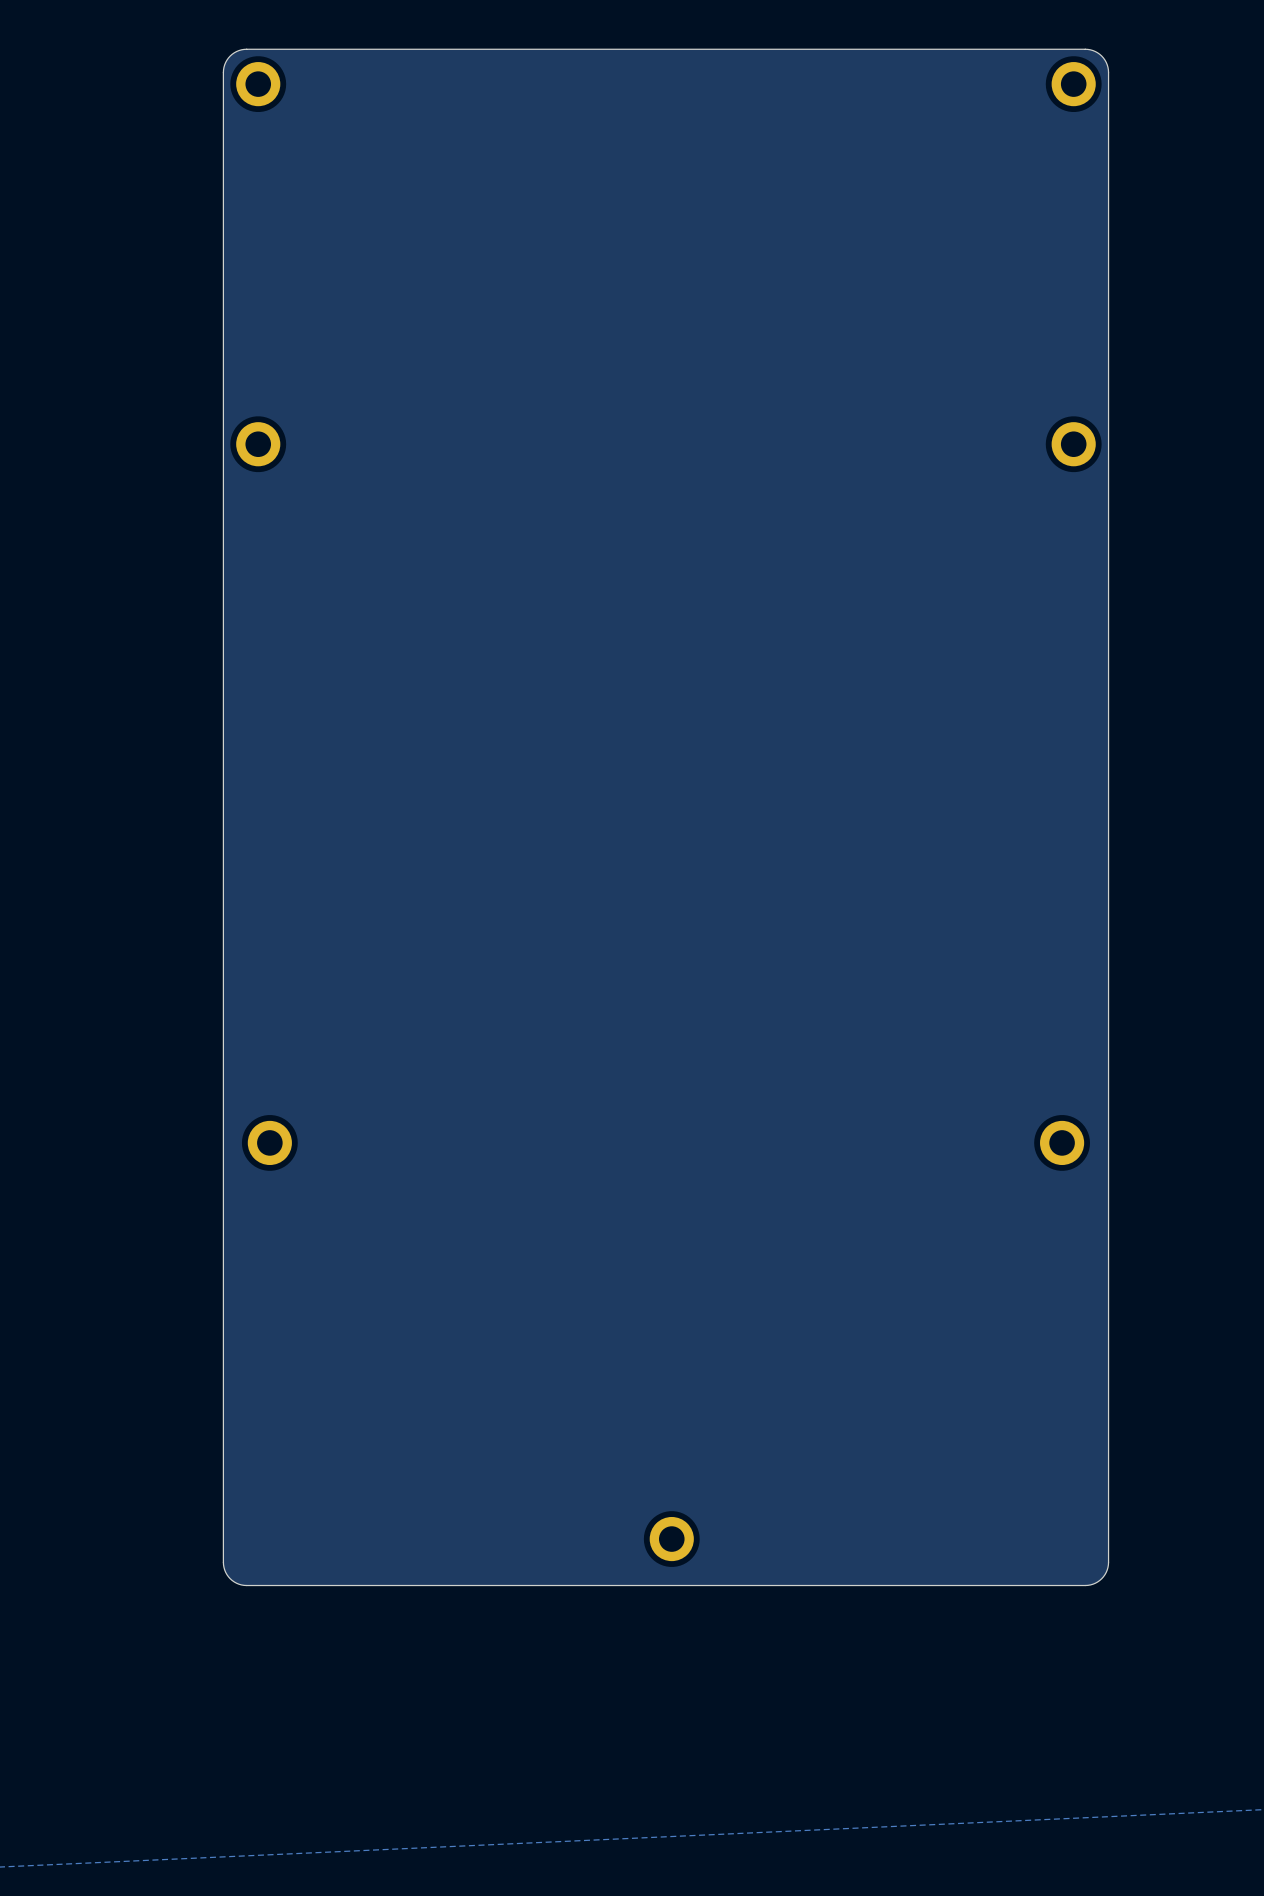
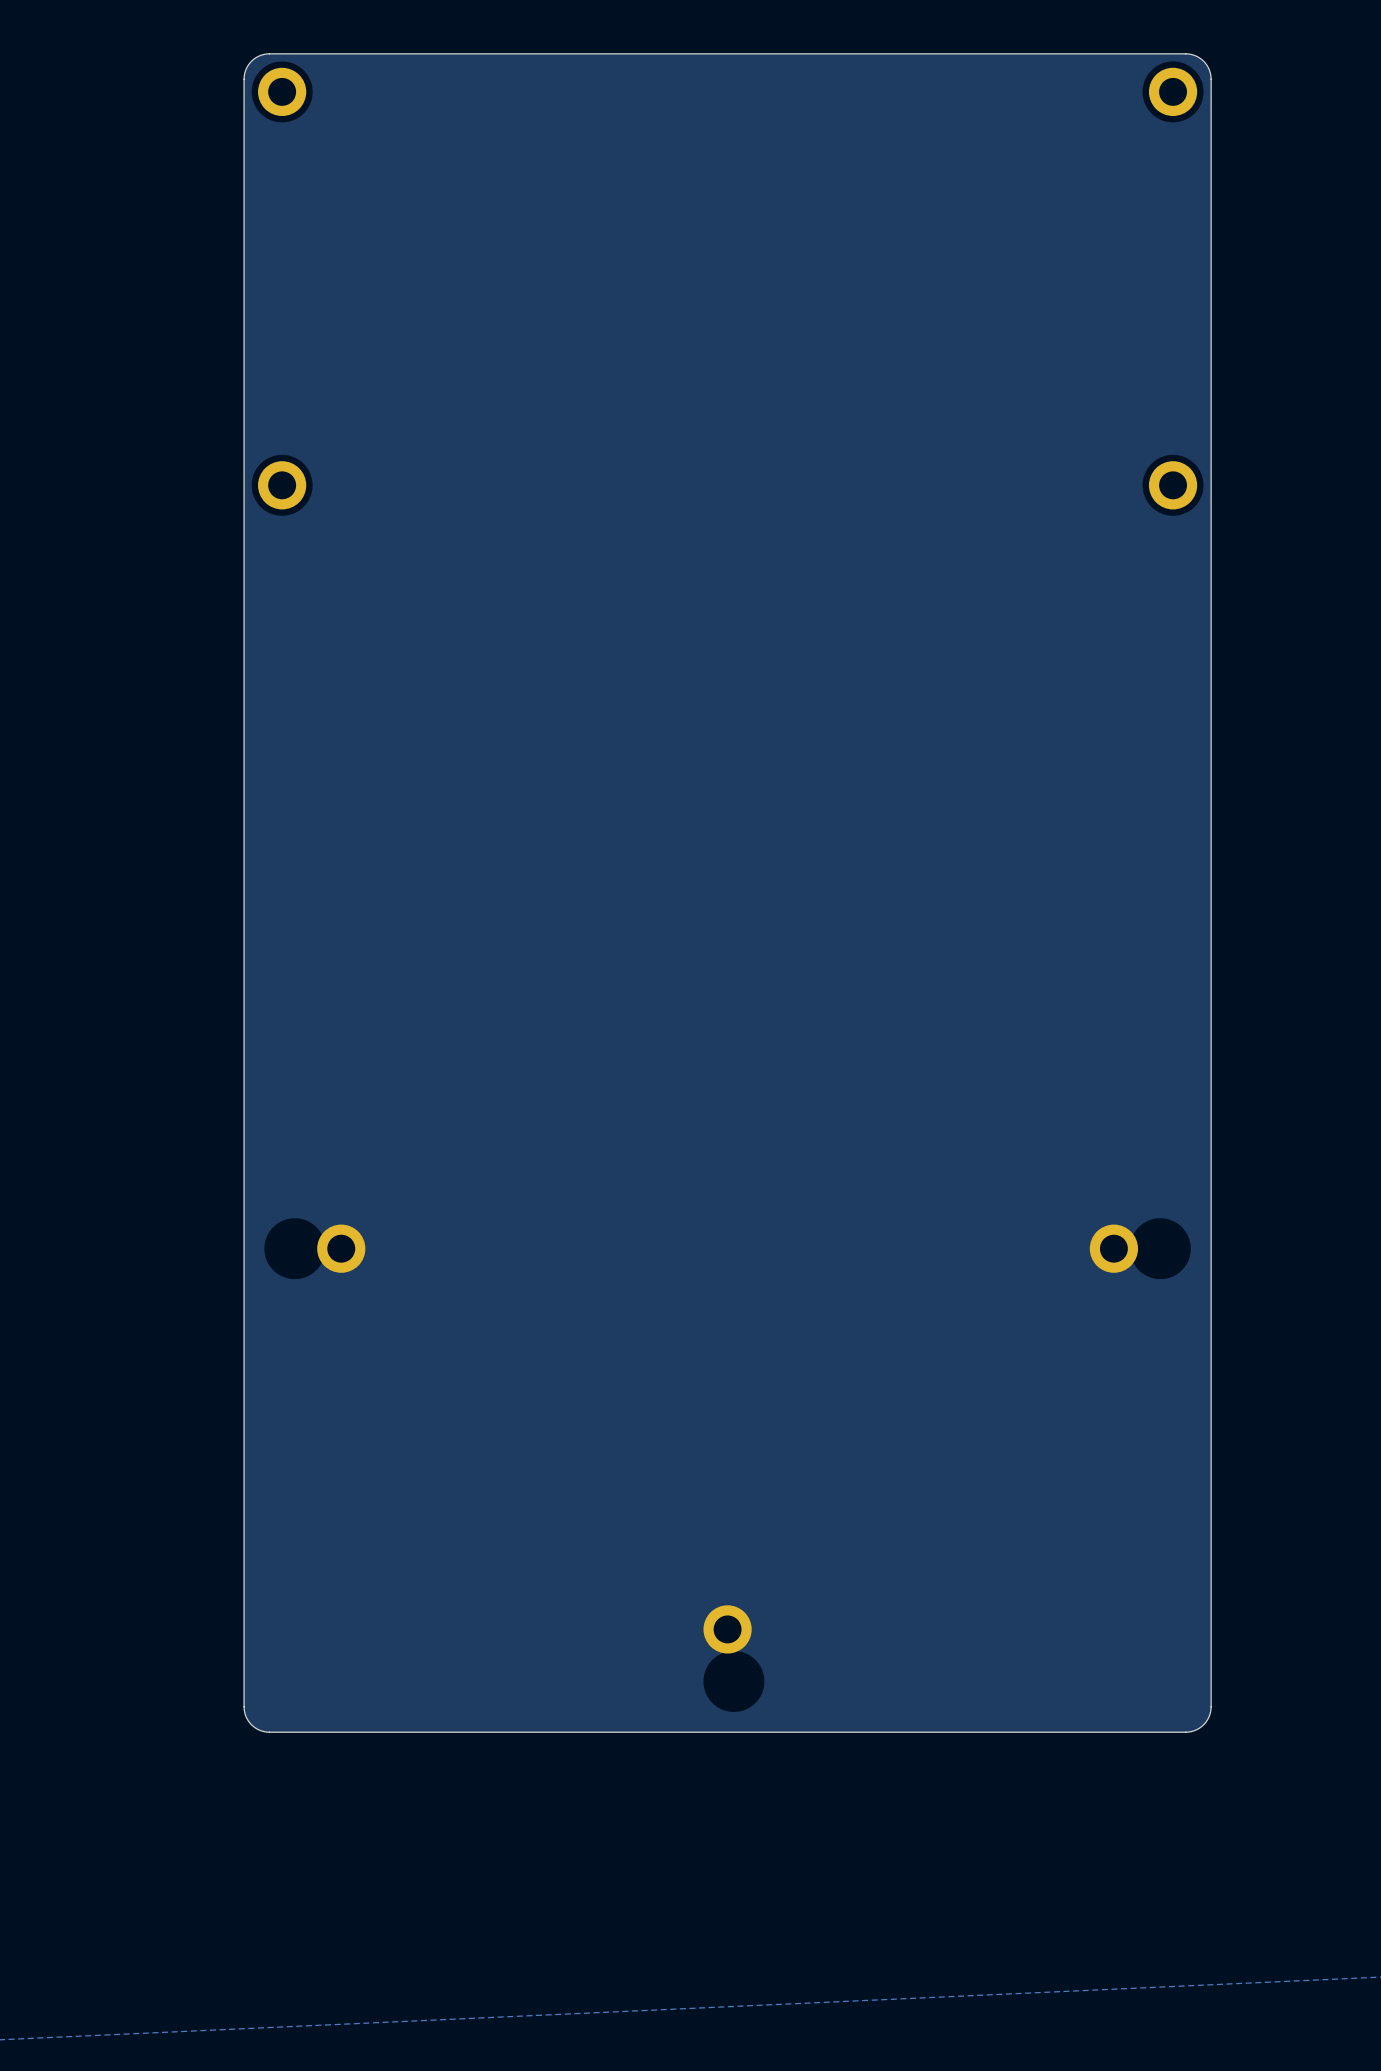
part position: (269, 1142) -> (341, 1248)
part position: (1062, 1142) -> (1113, 1248)
part position: (671, 1539) -> (727, 1629)

